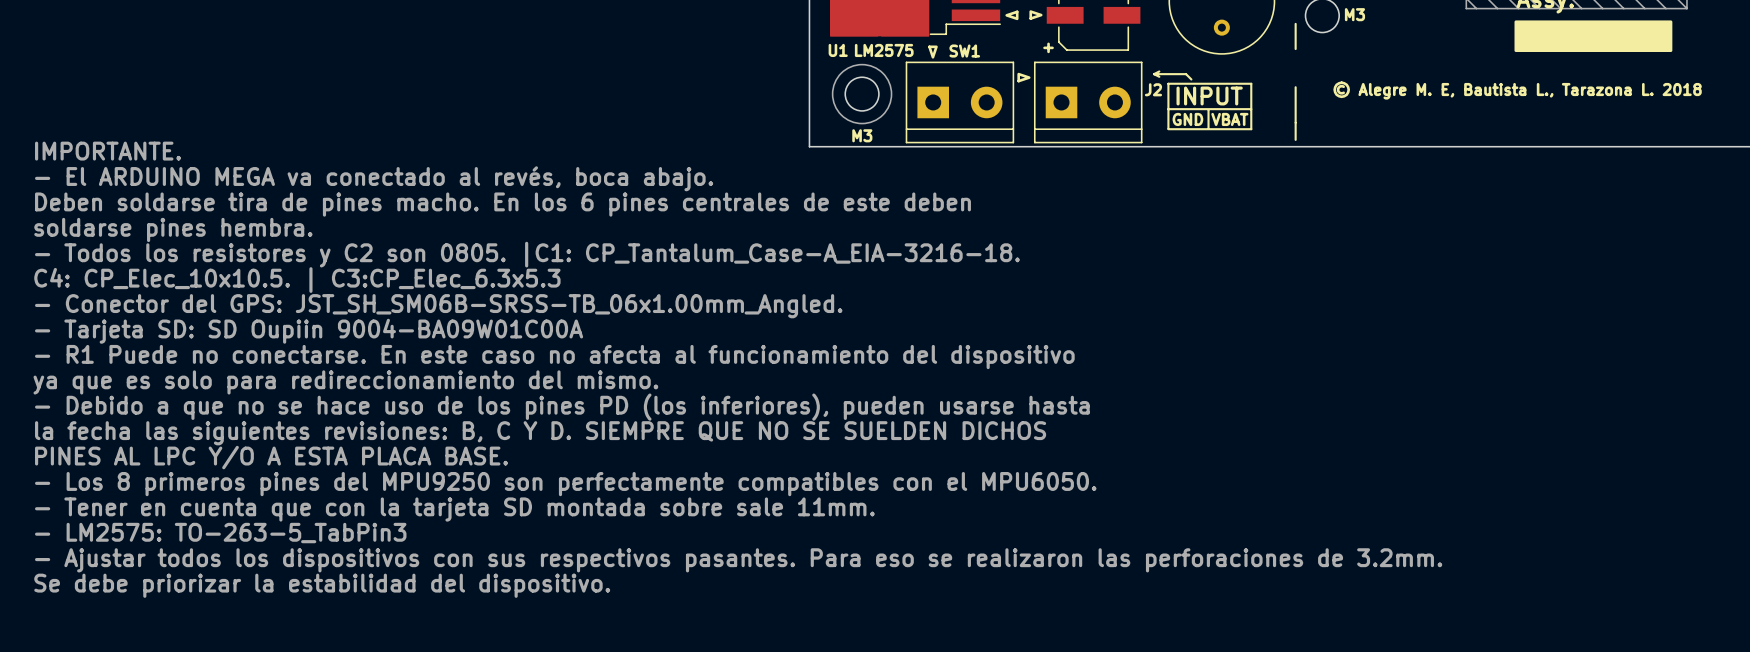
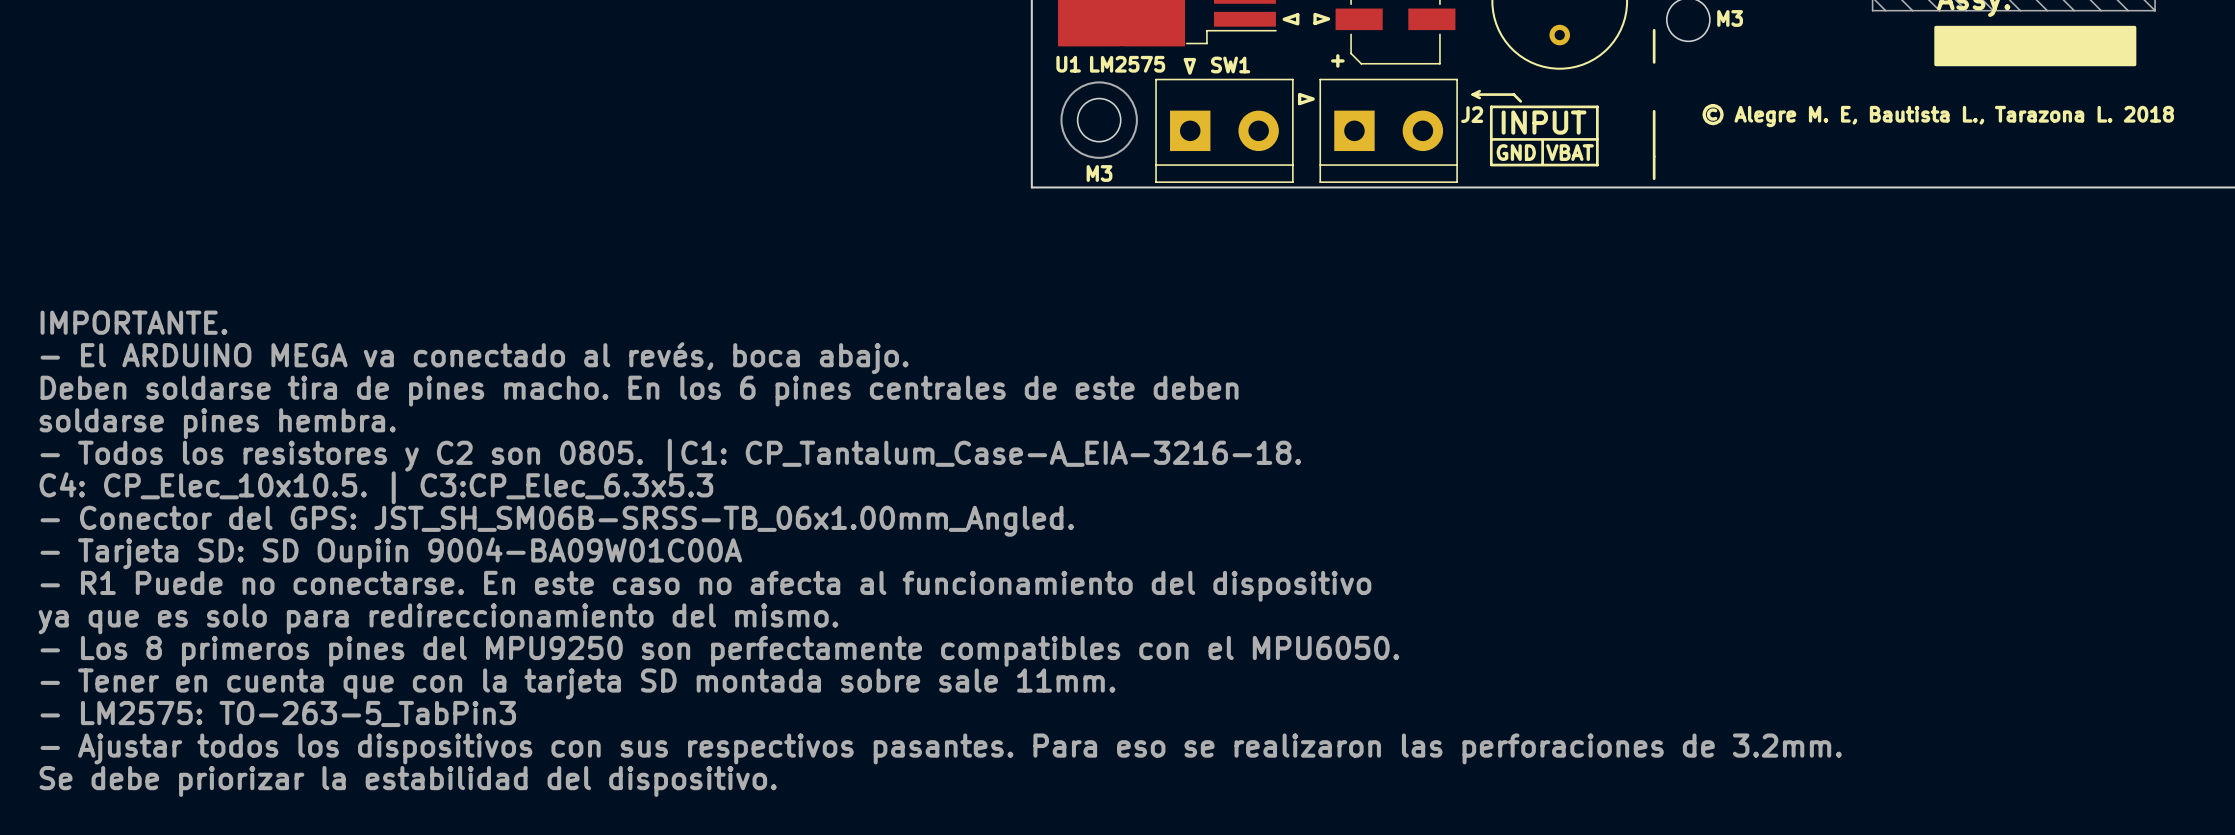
text: IMPORTANTE. (108, 151) -> none
text: - El ARDUINO MEGA va conectado al revés, boca abajo. (374, 178) -> none
text: Deben soldarse tira de pines macho. En los 6 pines centrales de este deben (502, 204) -> none
text: soldarse pines hembra. (173, 229) -> none
text: - Todos los resistores y C2 son 0805. |C1: CP_Tantalum_Case-A_EIA-3216-18. (527, 254) -> IMPORTANTE. (133, 322)
text: C4: CP_Elec_10x10.5. | C3:CP_Elec_6.3x5.3 (297, 280) -> - El ARDUINO MEGA va conectado al revés, boca abajo. (474, 358)
text: - Conector del GPS: JST_SH_SM06B-SRSS-TB_06x1.00mm_Angled. (438, 306) -> Deben soldarse tira de pines macho. En los 6 pines centrales de este deben (639, 391)
text: - Tarjeta SD: SD Oupiin 9004-BA09W01C00A (309, 331) -> soldarse pines hembra. (217, 423)
text: - R1 Puede no conectarse. En este caso no afecta al funcionamiento del dispositivo (554, 357) -> - Todos los resistores y C2 son 0805. |C1: CP_Tantalum_Case-A_EIA-3216-18. (670, 455)
text: ya que es solo para redireccionamiento del mismo. (345, 382) -> C4: CP_Elec_10x10.5. | C3:CP_Elec_6.3x5.3 (376, 487)
text: - Debido a que no se hace uso de los pines PD (los inferiores), pueden usarse hasta (562, 407) -> - Conector del GPS: JST_SH_SM06B-SRSS-TB_06x1.00mm_Angled. (557, 521)
text: la fecha las siguientes revisiones: B, C Y D. SIEMPRE QUE NO SE SUELDEN DICHOS (540, 433) -> - Tarjeta SD: SD Oupiin 9004-BA09W01C00A (391, 553)
text: PINES AL LPC Y/O A ESTA PLACA BASE. (271, 457) -> - R1 Puede no conectarse. En este caso no afecta al funcionamiento del dispositivo (705, 586)
text: - Los 8 primeros pines del MPU9250 son perfectamente compatibles con el MPU6050. (565, 484) -> ya que es solo para redireccionamiento del mismo. (438, 618)
text: - Tener en cuenta que con la tarjeta SD montada sobre sale 11mm. (454, 509) -> - Los 8 primeros pines del MPU9250 son perfectamente compatibles con el MPU6050. (719, 651)
text: - LM2575: TO-263-5_TabPin3 (220, 533) -> - Tener en cuenta que con la tarjeta SD montada sobre sale 11mm. (577, 683)
text: - Ajustar todos los dispositivos con sus respectivos pasantes. Para eso se realizaron las perforaciones de 3.2mm. (738, 560) -> - LM2575: TO-263-5_TabPin3 (278, 713)
text: Se debe priorizar la estabilidad del dispositivo. (322, 585) -> - Ajustar todos los dispositivos con sus respectivos pasantes. Para eso se realizaron las perforaciones de 3.2mm. (941, 748)
text: none -> Se debe priorizar la estabilidad del dispositivo. (408, 781)

